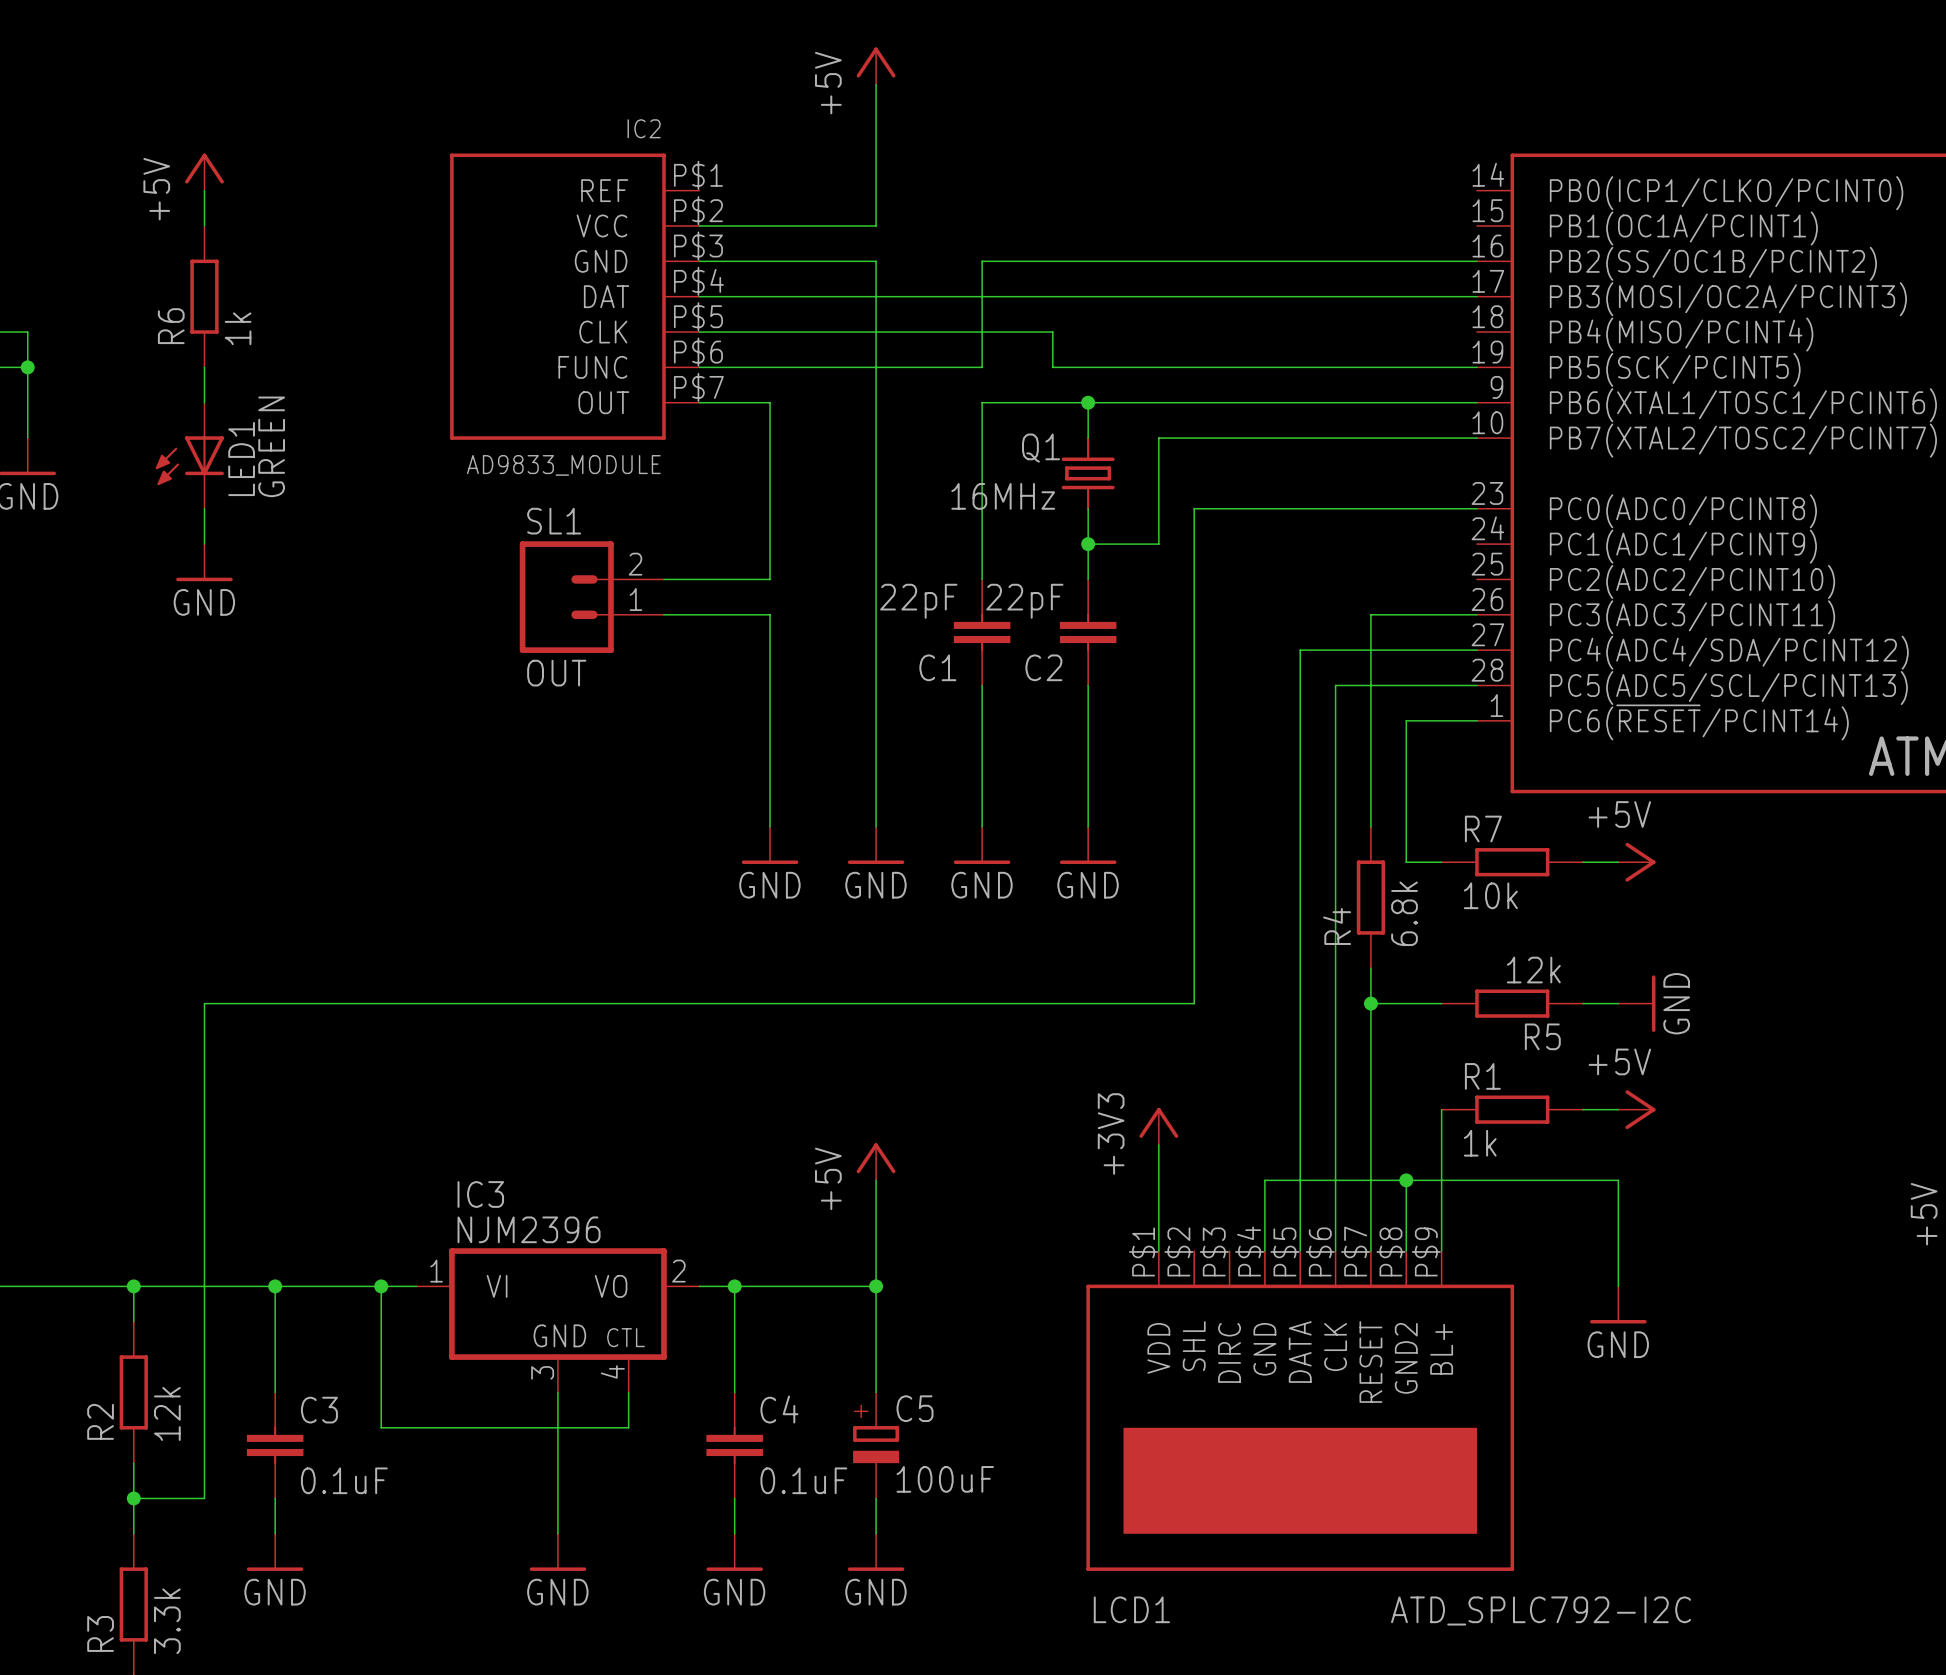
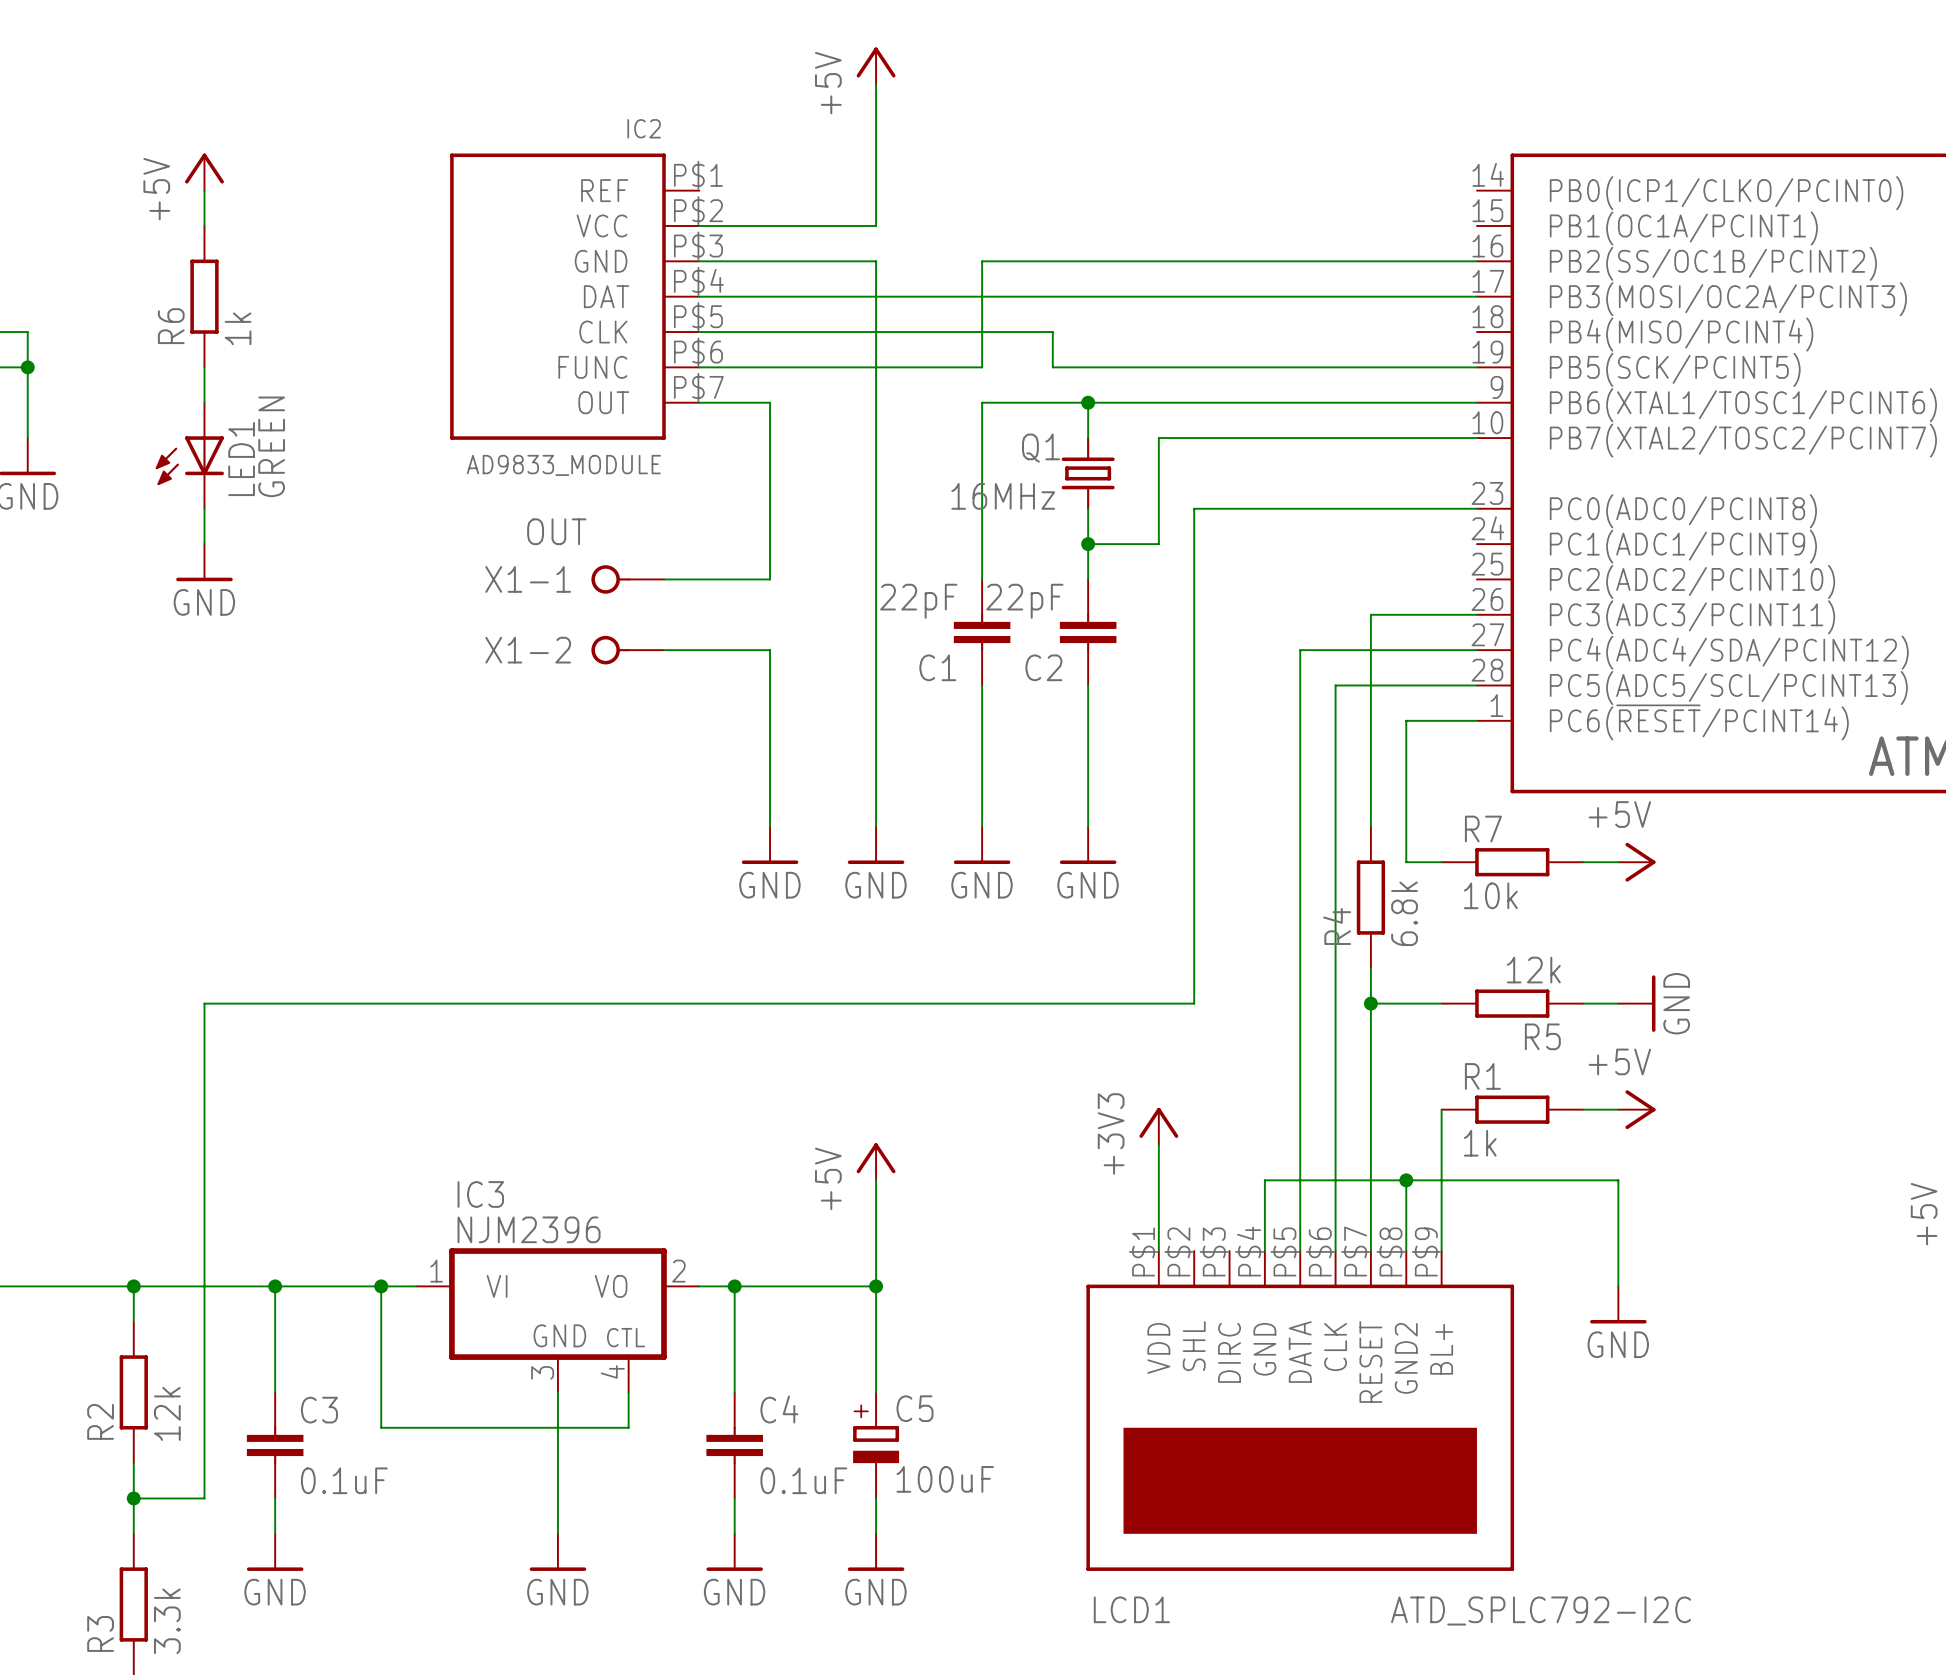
X1-1: none -> (627, 579)
SL1: OUT (591, 597) -> none
wire: (663, 614) (770, 614) (770, 650) -> (663, 650) (770, 650)
X1-2: none -> OUT (627, 650)

